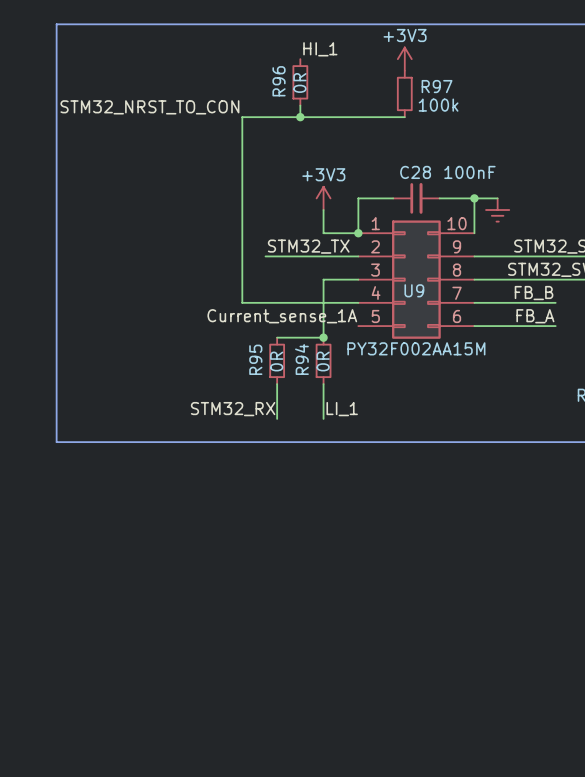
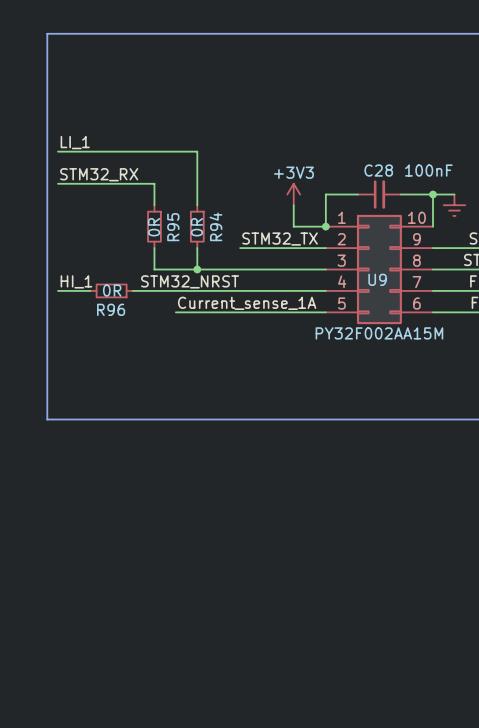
label: HI_1 (320, 49) -> none
power symbol: +3V3 (404, 59) -> none
R96 name position: R96 (279, 81) -> R96 (111, 309)
R96 rotation: 0° (300, 82) -> 90° clockwise (111, 290)
R96 position: (300, 82) -> (111, 290)
R97: 100k (404, 93) -> none
wire: (300, 105) (300, 117) -> none
label: STM32_NRST_TO_CON (149, 107) -> none
junction: (300, 117) -> none
wire: (404, 117) (242, 117) (242, 302) -> (133, 290) (218, 290)
label: none -> LI_1 (75, 142)
wire: none -> (58, 151) (197, 151) (197, 205)
label: none -> STM32_RX (99, 174)
wire: none -> (58, 183) (154, 183) (154, 205)
wire: none -> (197, 248) (197, 269)
junction: none -> (197, 269)
wire: (323, 279) (323, 337) (277, 337) -> (293, 269) (154, 269) (154, 248)
label: none -> HI_1 (76, 281)
label: none -> STM32_NRST (190, 281)
wire: none -> (58, 290) (90, 290)
label position: Current_sense_1A (282, 316) -> Current_sense_1A (247, 303)
wire: none -> (175, 312) (325, 312)
junction: (323, 337) -> none
R95 name position: R95 (255, 359) -> R95 (173, 227)
R94 name position: R94 (301, 359) -> R94 (215, 226)
R95 position: (277, 360) -> (154, 226)
R94 position: (323, 360) -> (197, 226)
wire: (277, 384) (277, 418) -> none
wire: (323, 384) (323, 418) -> none
label: STM32_RX (233, 409) -> none
label: LI_1 (342, 409) -> none

